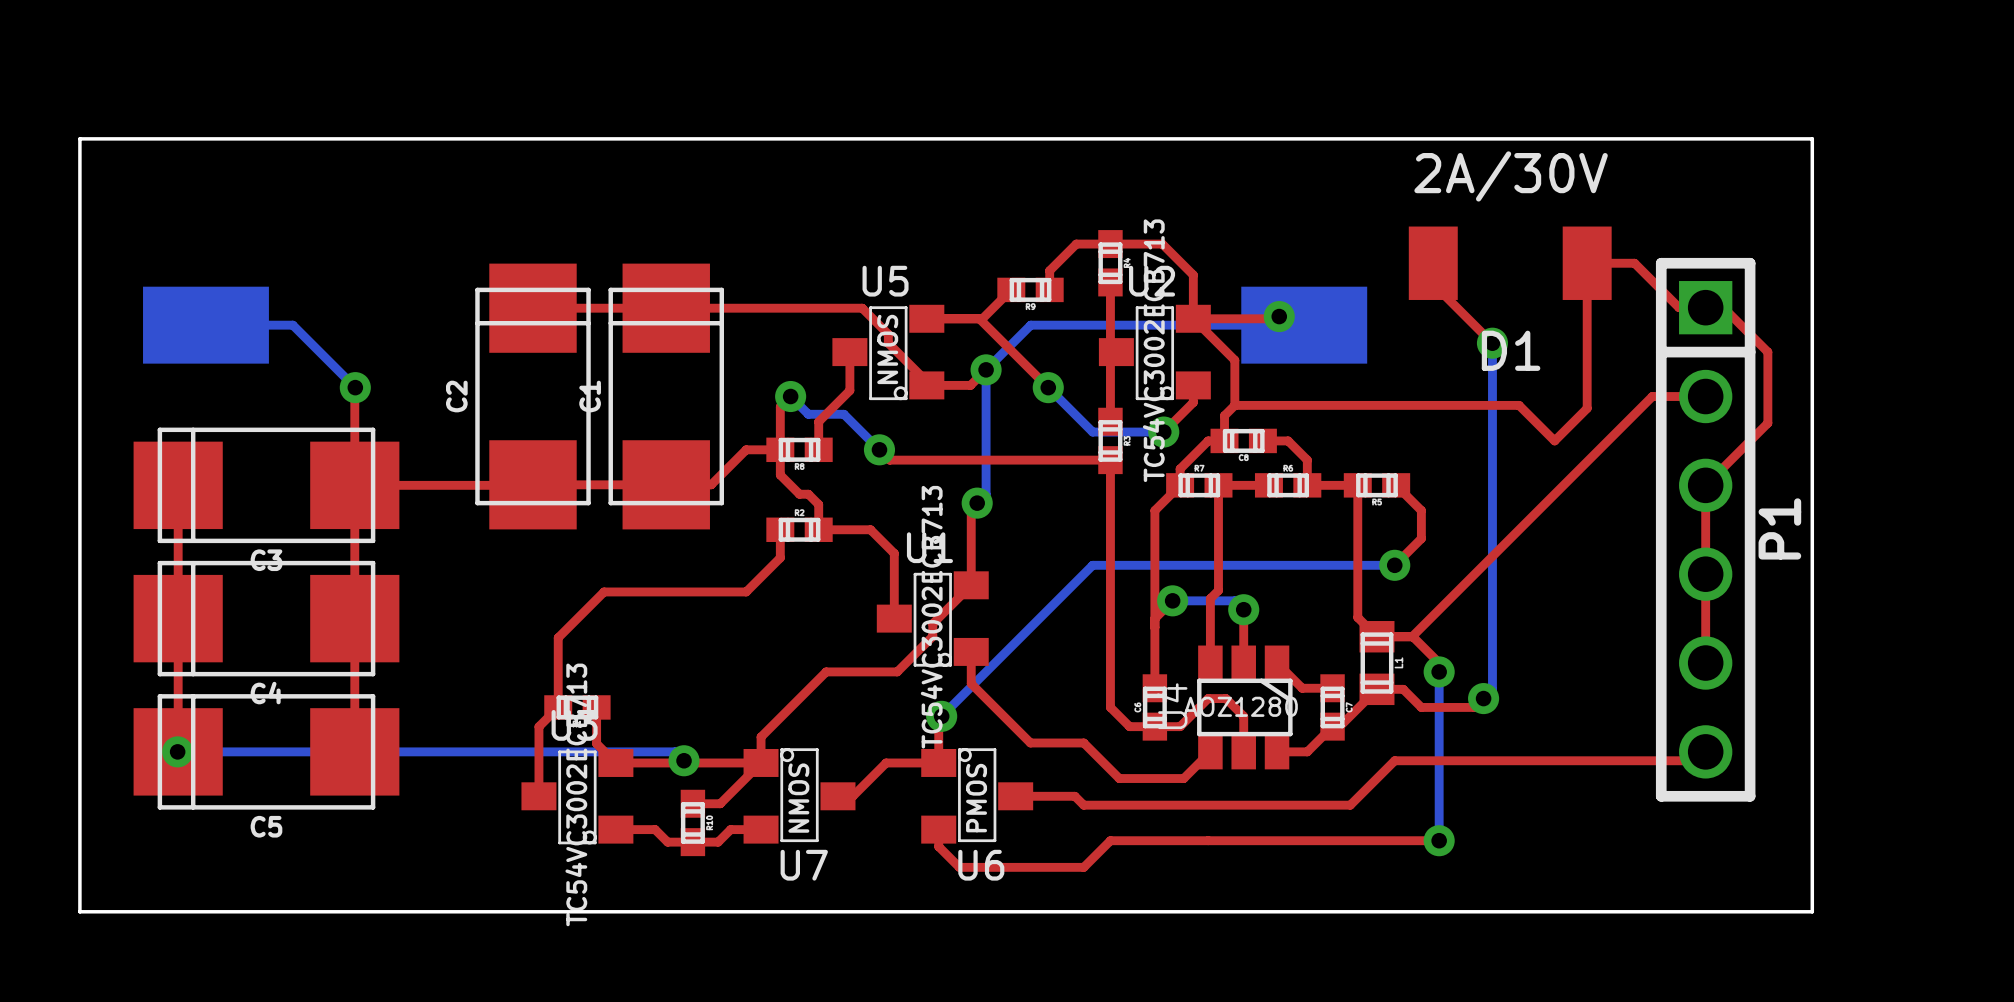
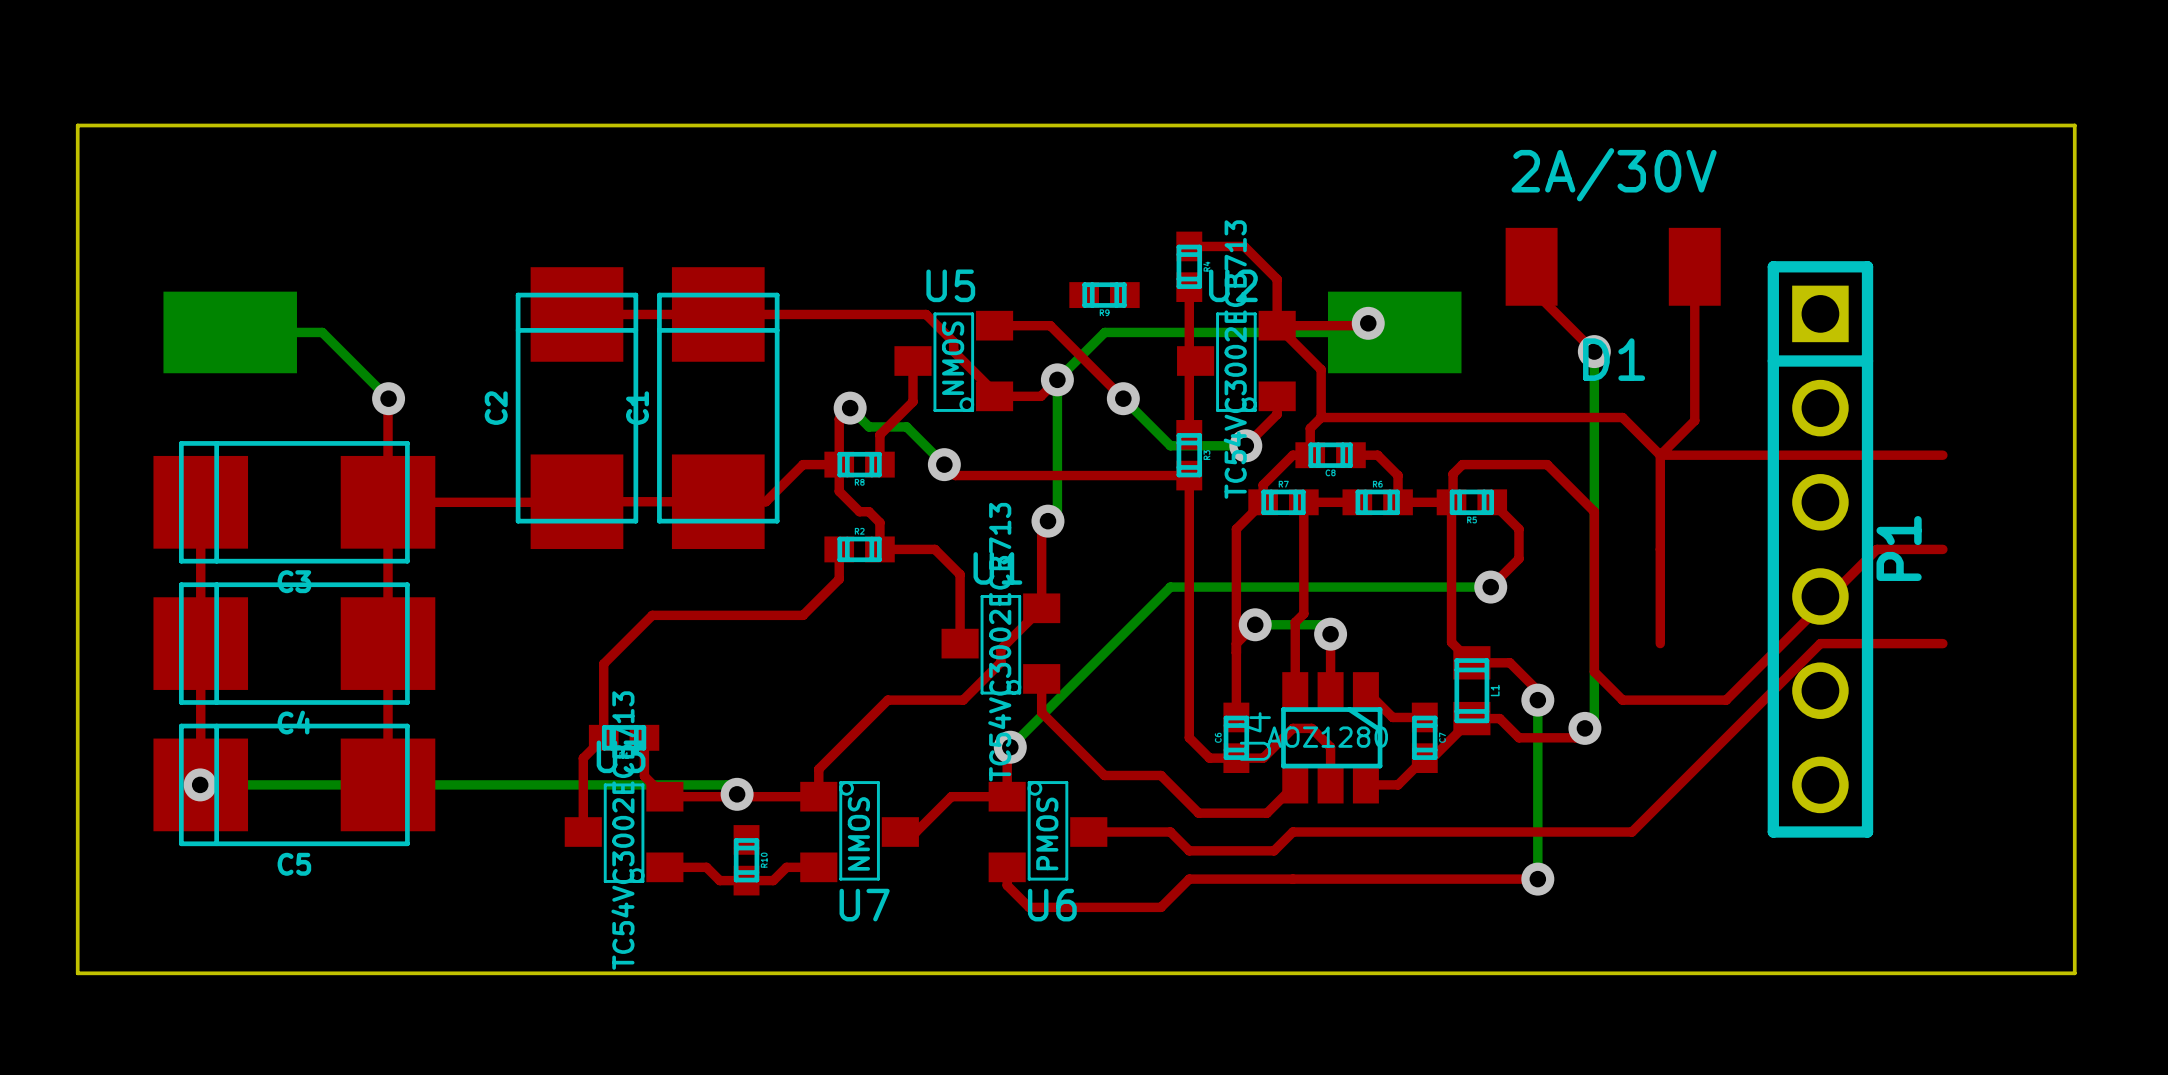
board edge: (79, 138) (1812, 138) (1812, 911) (79, 911) (79, 138) -> (77, 125) (77, 973) (2074, 973) (2074, 125) (77, 125)
top track: (1110, 244) (1076, 244) (1049, 270) (1049, 289) -> none
top track: (1587, 263) (1634, 263) (1679, 307) (1723, 307) (1767, 352) (1767, 423) (1705, 485) (1705, 663) -> none
top track: (1011, 289) (982, 318) (979, 318) -> none
top track: (1705, 396) (1652, 396) (1412, 636) -> none
top track: none -> (1942, 455) (1660, 455) (1660, 643)
top track: none -> (1451, 502) (1453, 474) (1462, 464) (1547, 464) (1594, 511) (1594, 671) (1622, 700) (1726, 700) (1876, 549) (1942, 549)
top track: (1705, 751) (1696, 760) (1394, 760) (1350, 805) (1083, 805) (1074, 796) -> (1942, 643) (1820, 643) (1632, 832) (1292, 832) (1274, 850) (1189, 850) (1170, 832) (1151, 832)
top track: (761, 762) (720, 803) (692, 803) -> none

